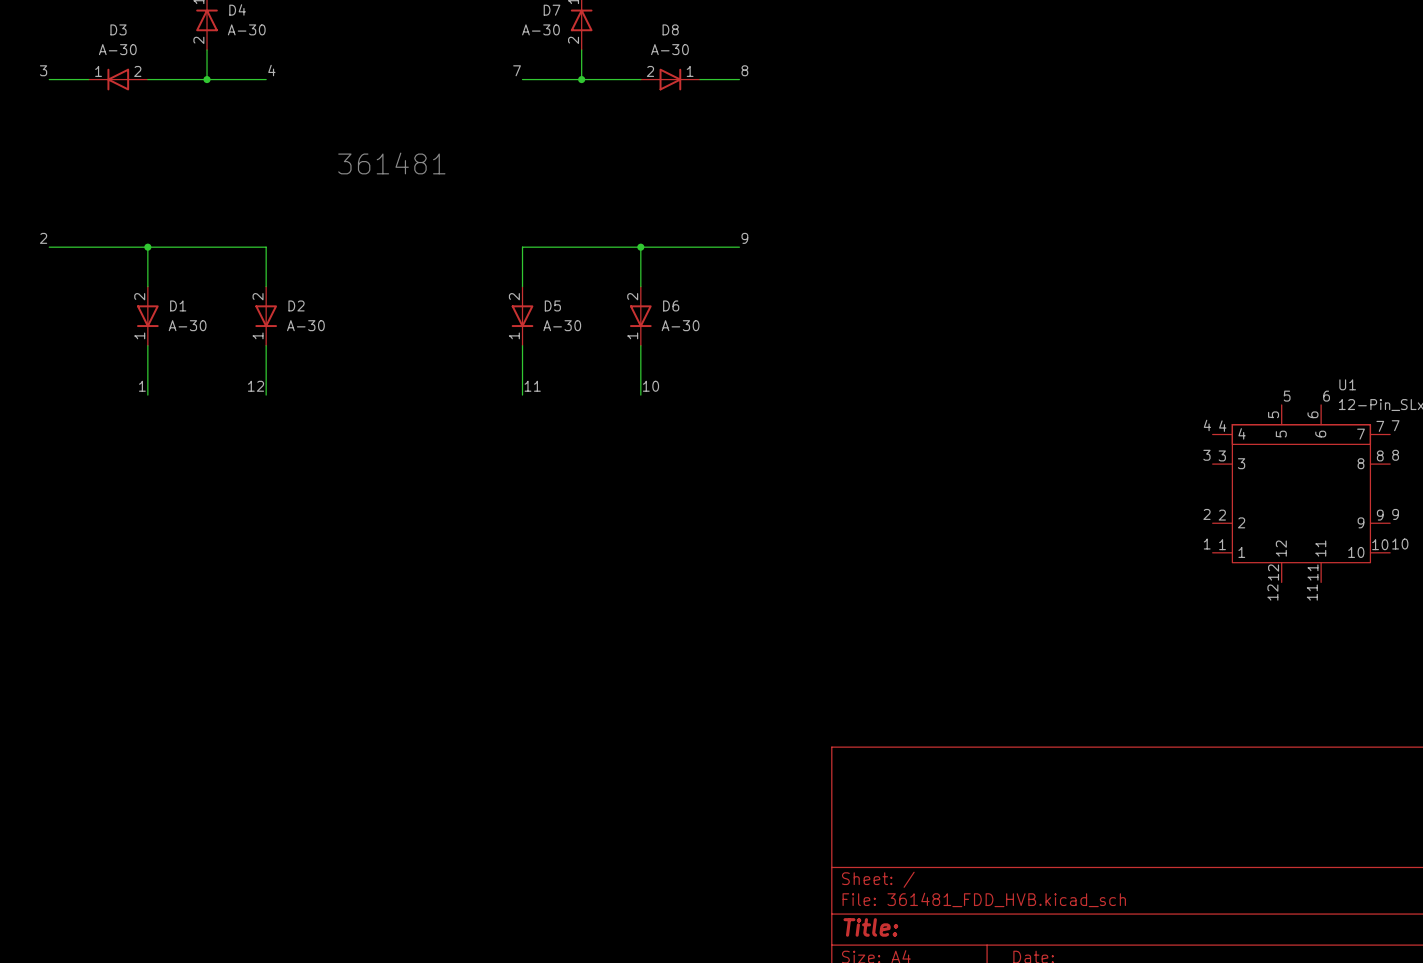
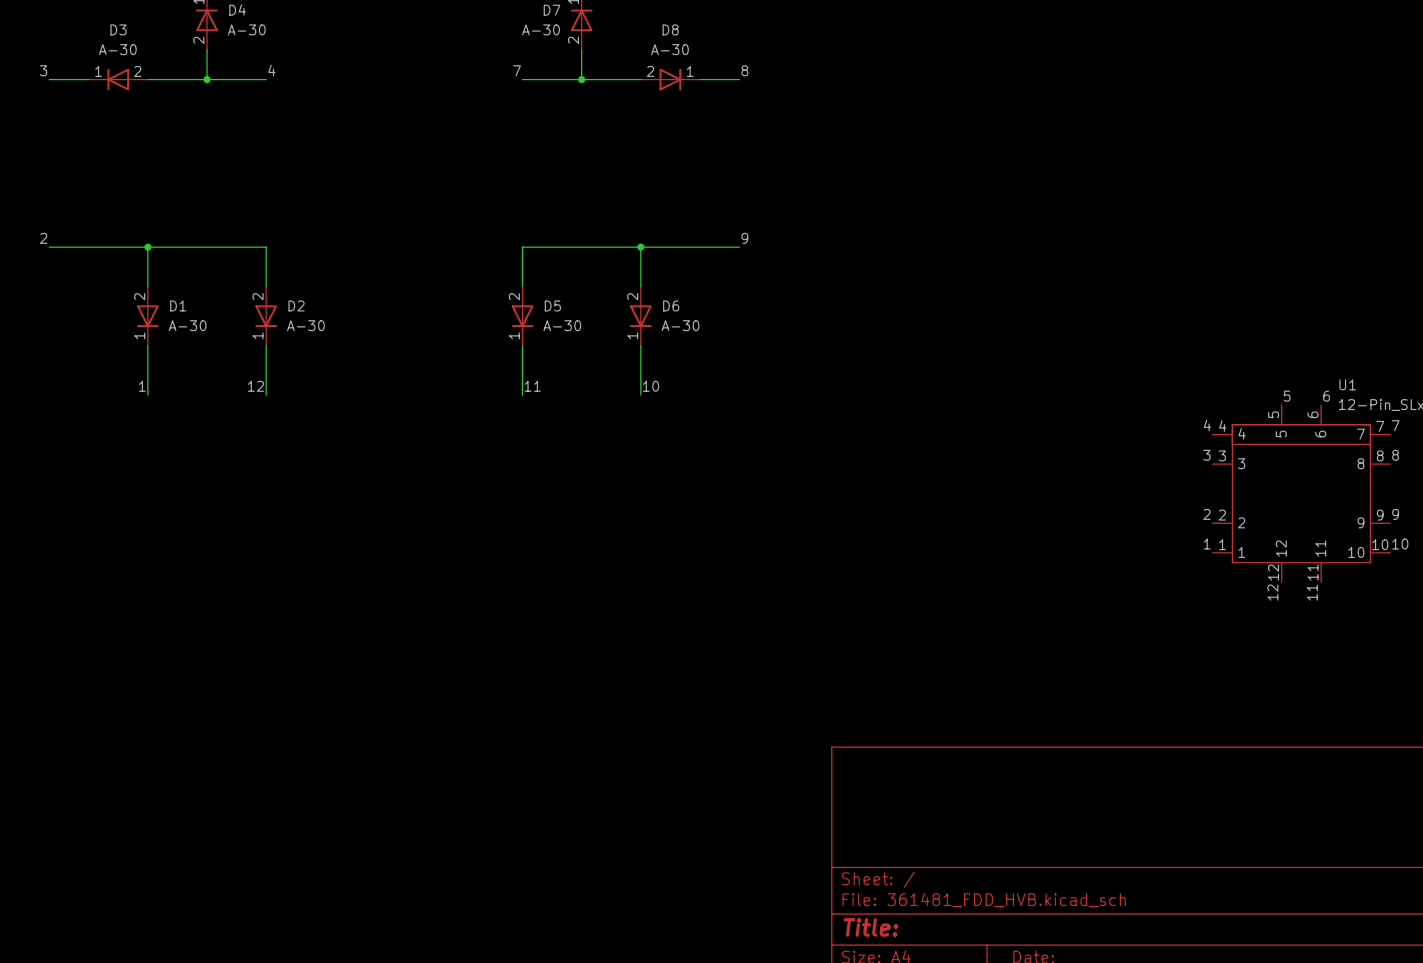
text: 361481 (391, 163) -> none

